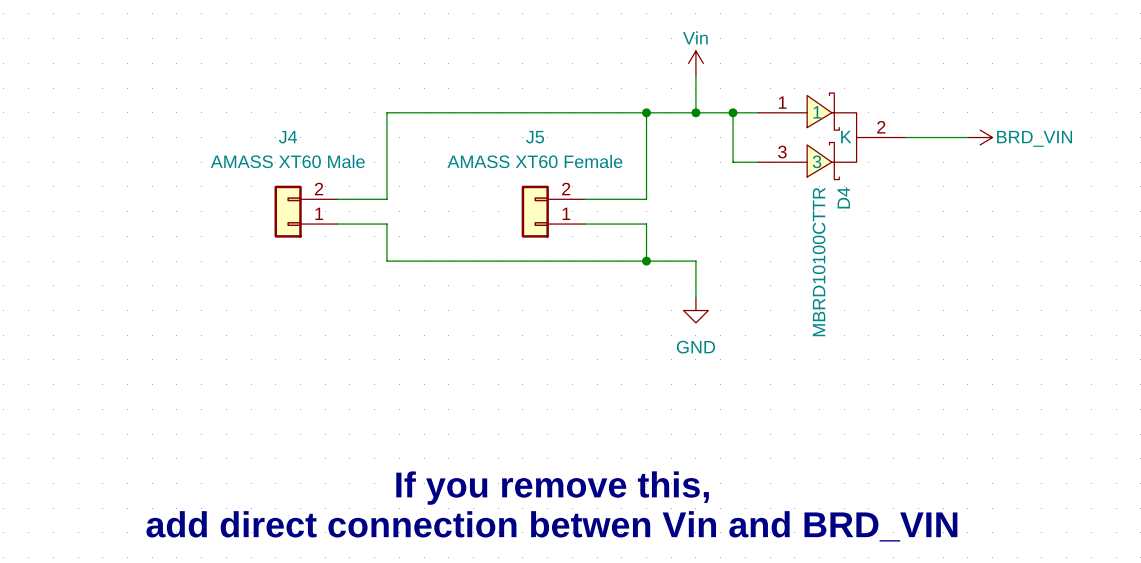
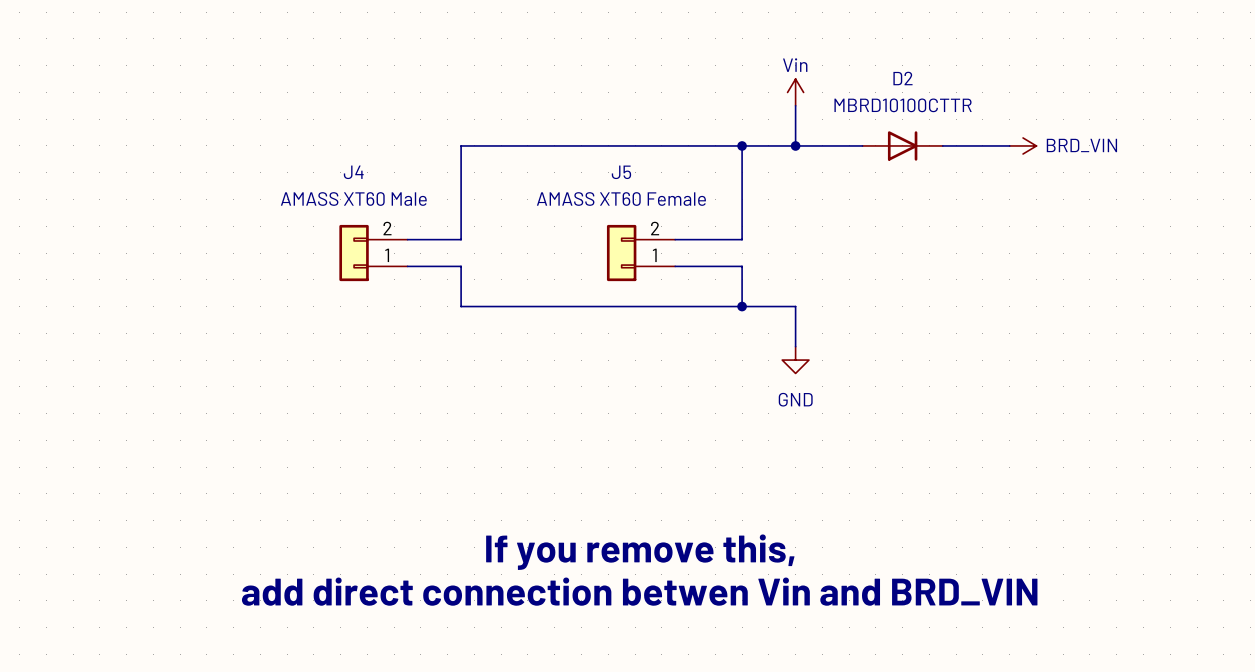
wire: (733, 112) (733, 162) (757, 162) -> none
junction: (733, 112) -> none
D2: none -> MBRD10100CTTR (902, 145)
D4: MBRD10100CTTR (831, 136) -> none
wire: (906, 137) (967, 137) -> (942, 145) (1009, 145)
power symbol position: BRD_VIN (980, 137) -> BRD_VIN (1023, 145)

